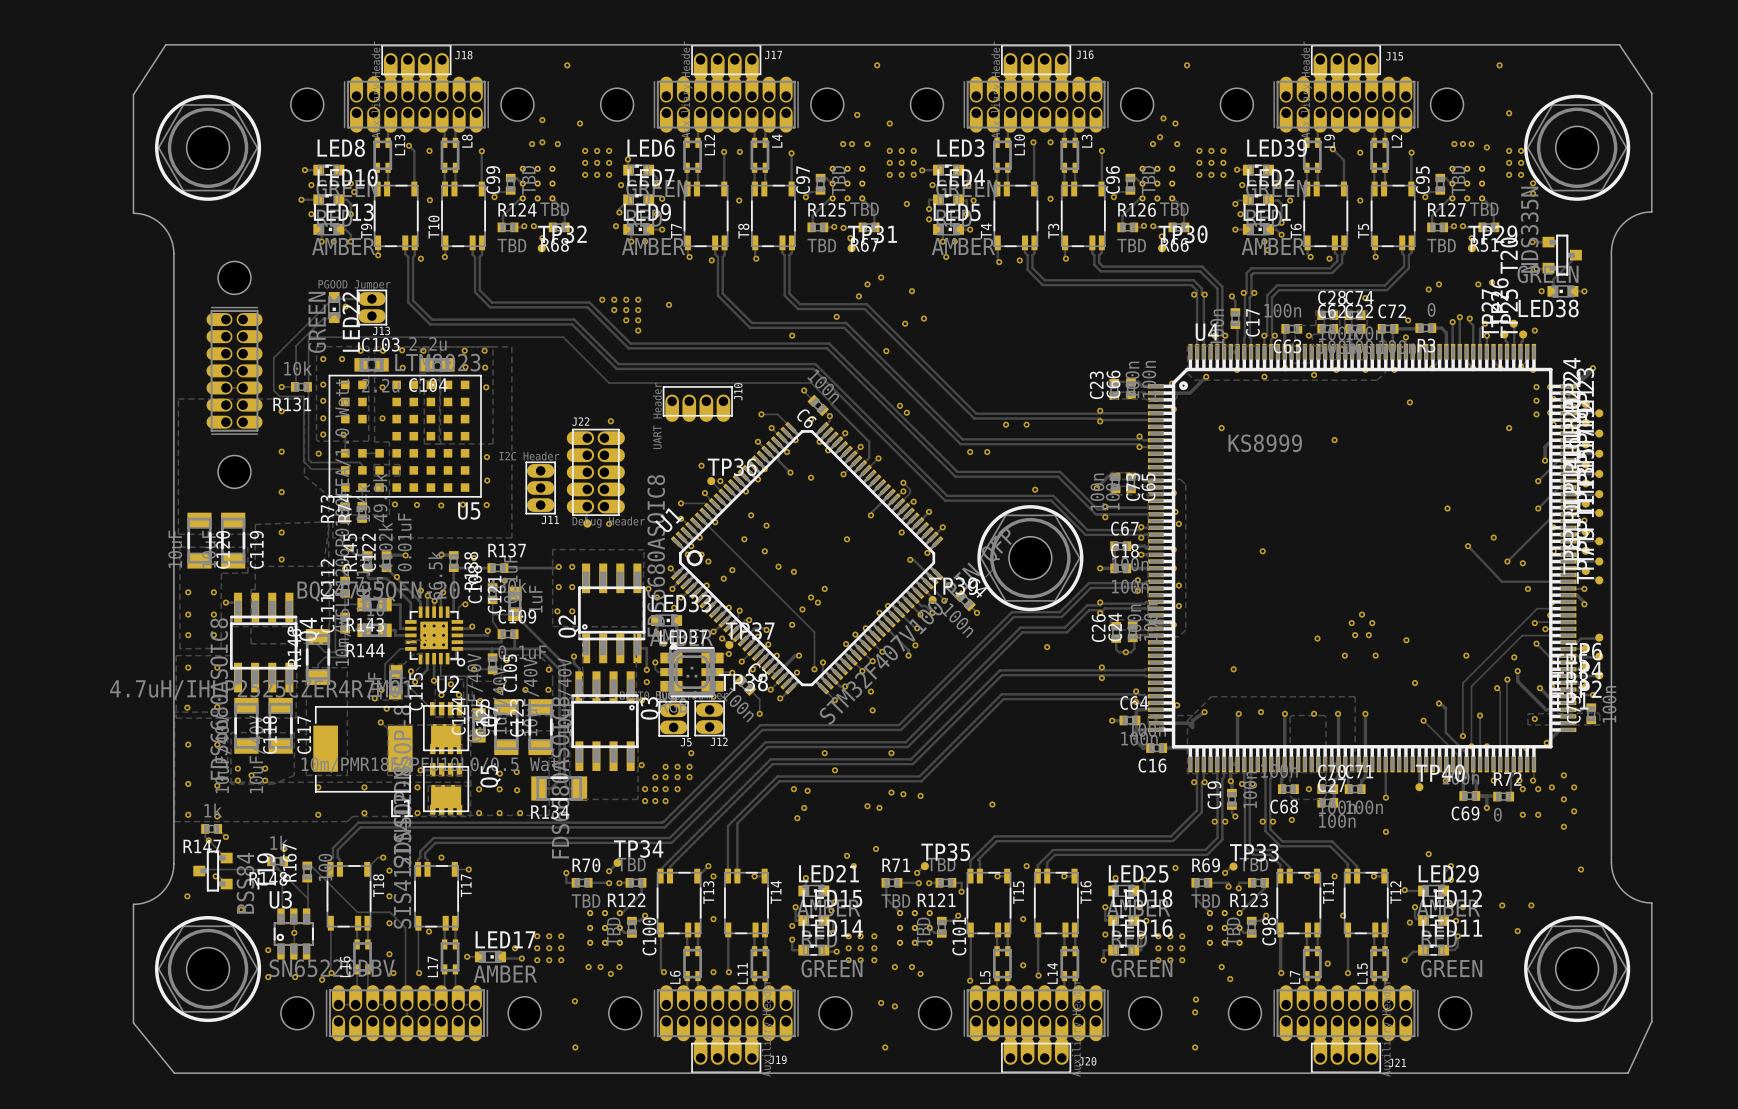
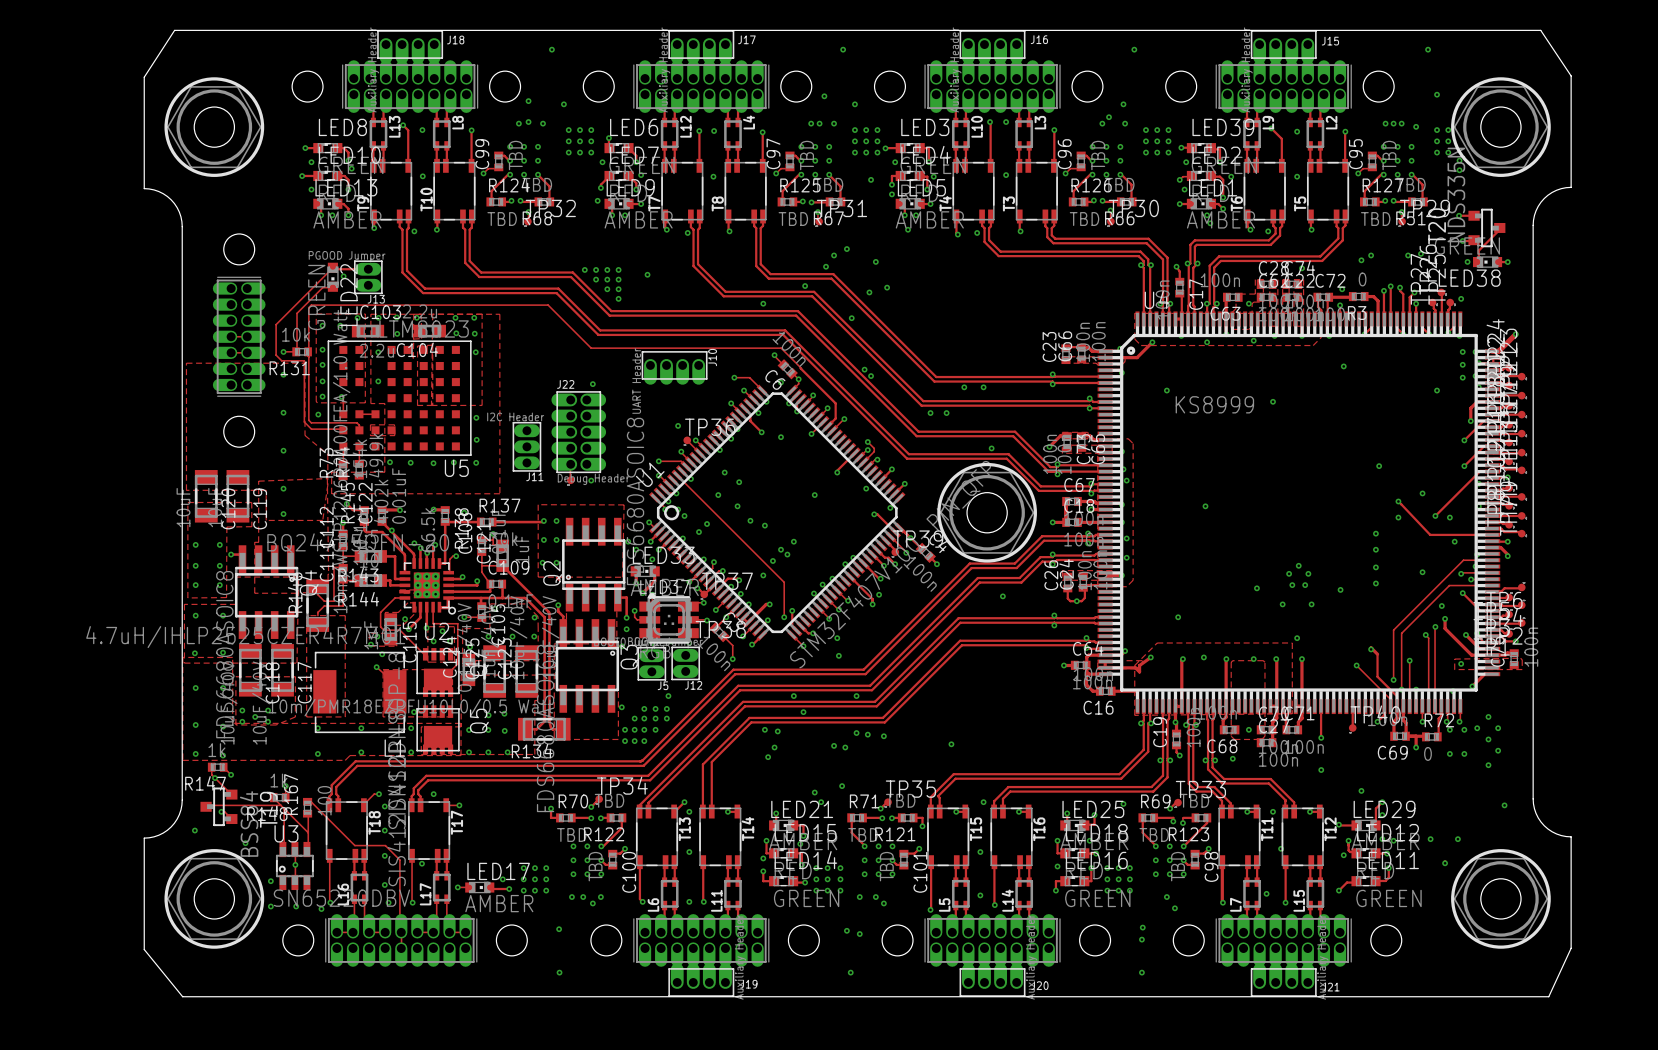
via: (1163, 118) -> none
via: none -> (1398, 517)
via: none -> (1375, 533)
via: none -> (1375, 549)
via: none -> (1375, 567)
via: none -> (1422, 572)
via: none -> (1375, 583)
via: (1466, 655) -> none
via: (1415, 683) -> none
via: none -> (1297, 638)

